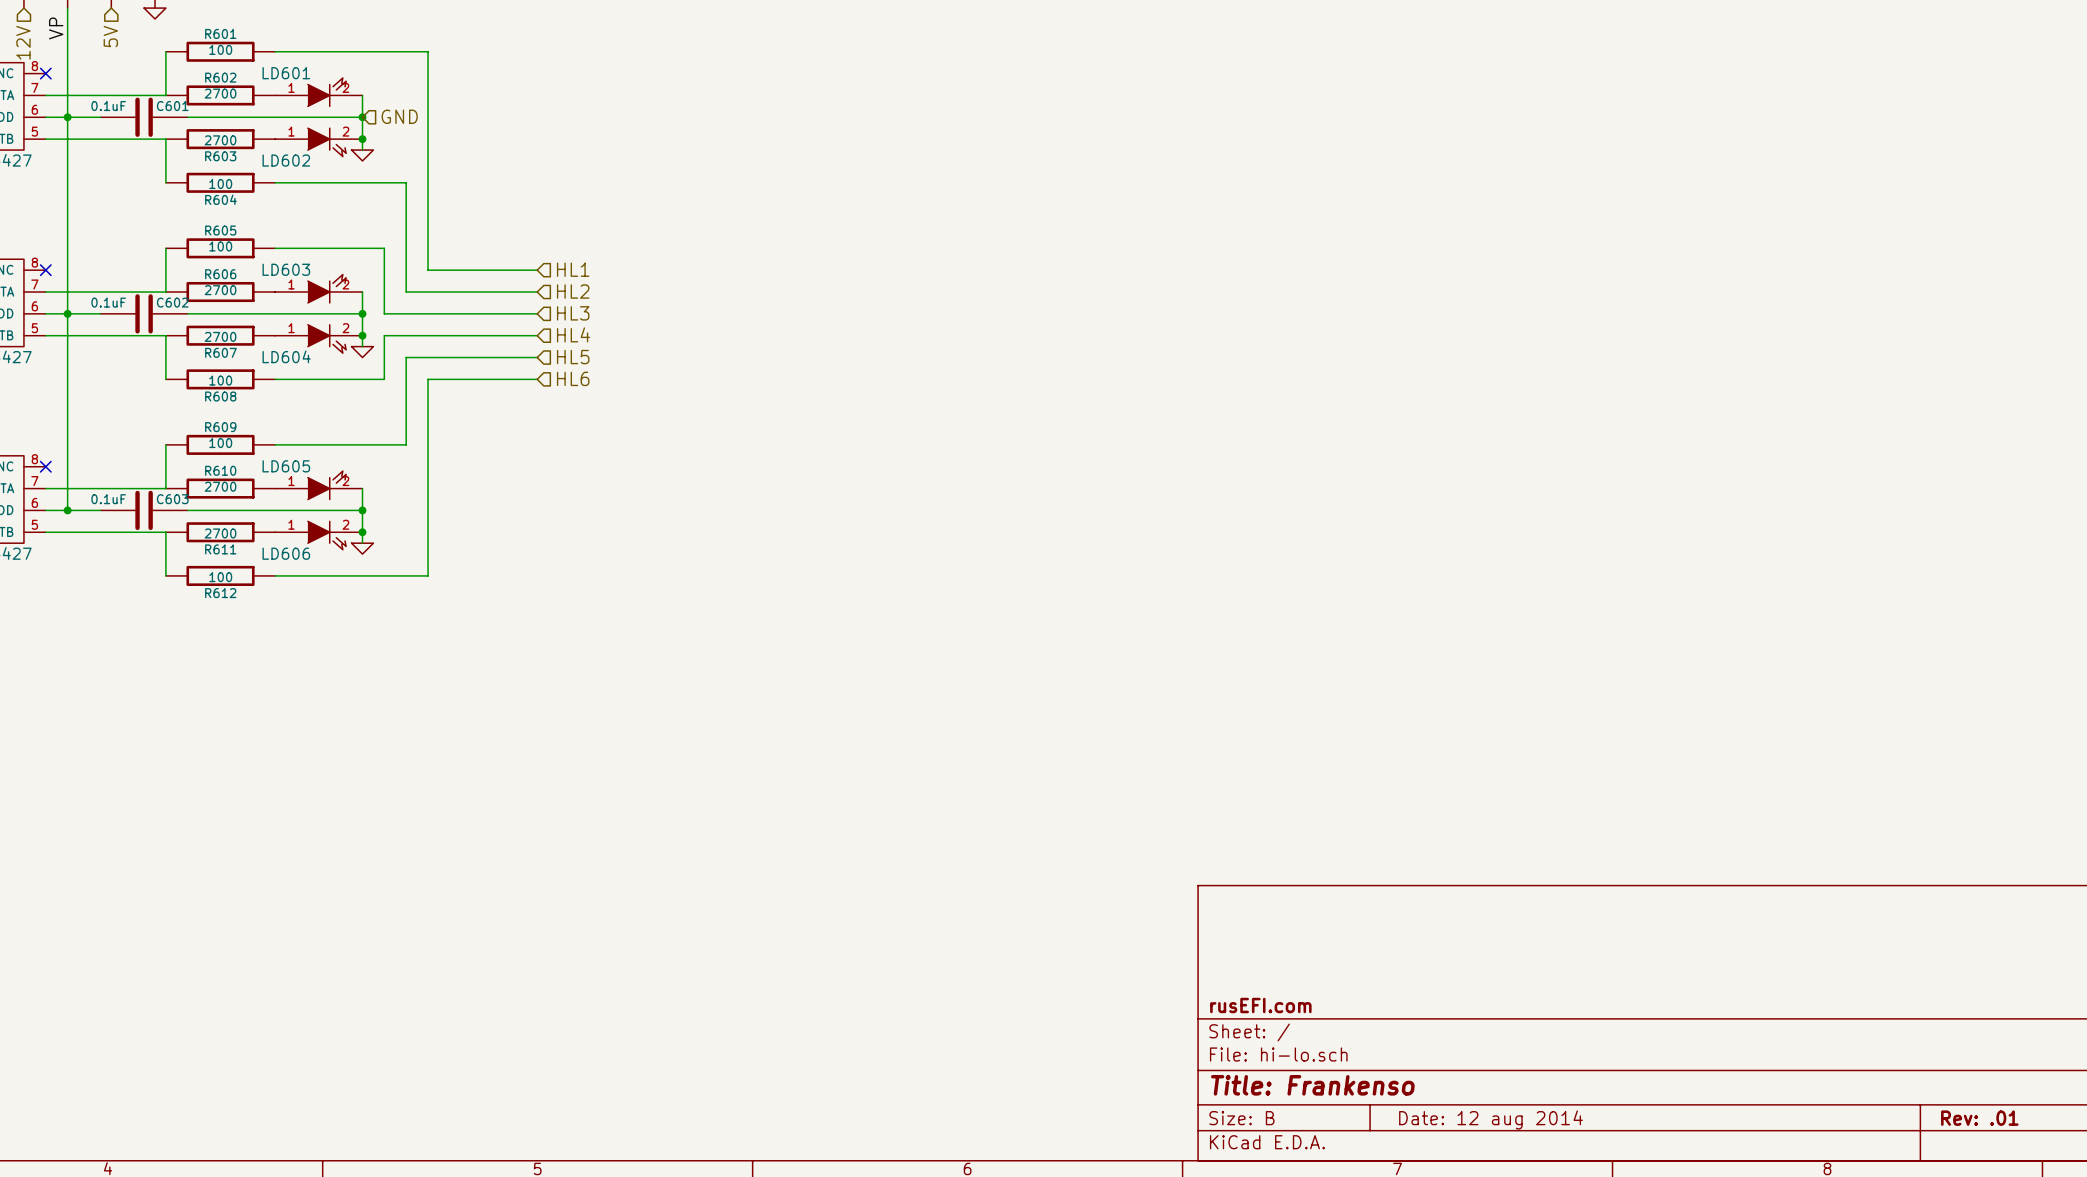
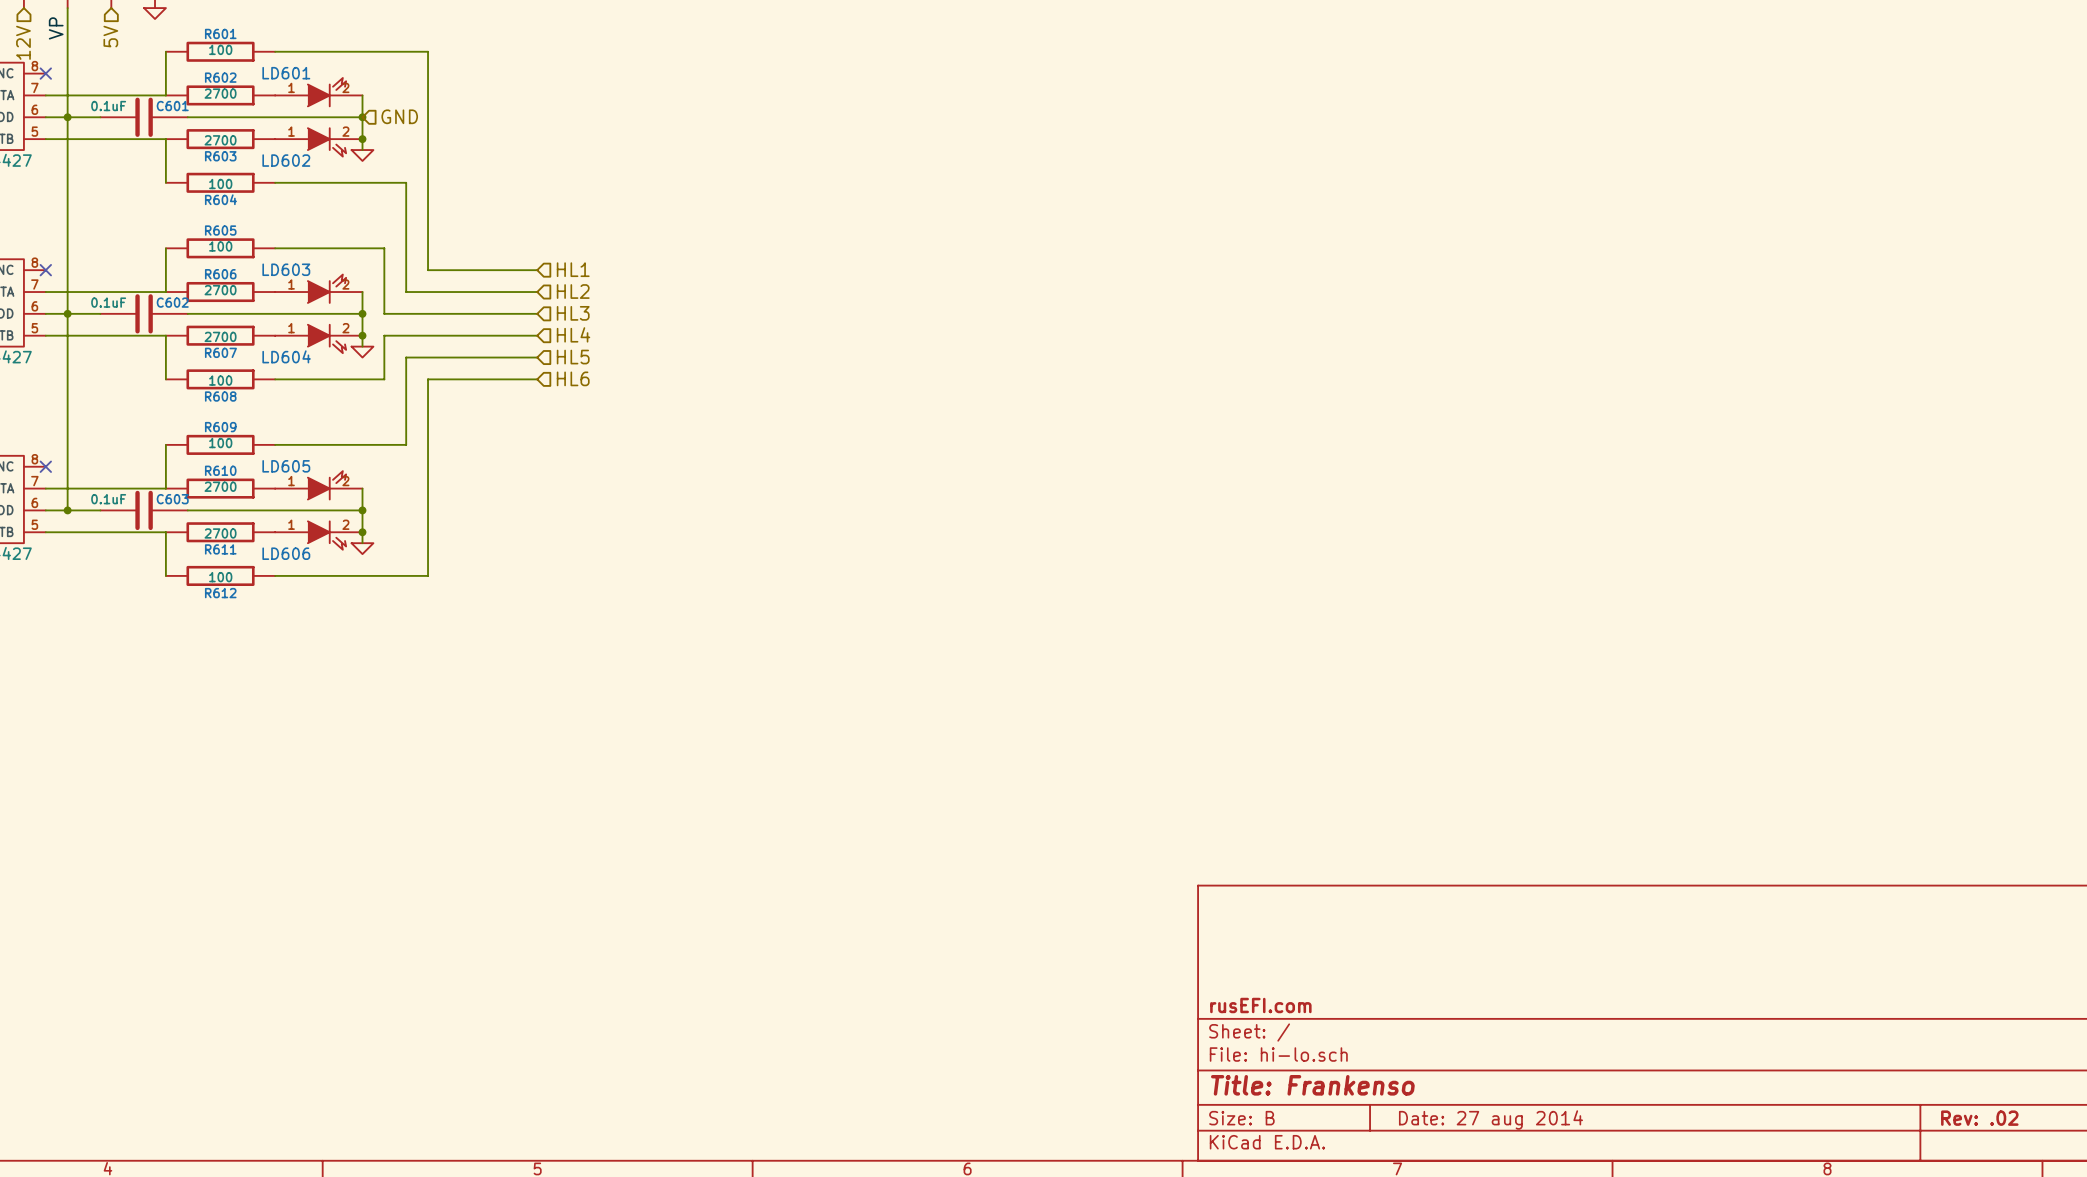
title block: Rev: .01 (1979, 1118) -> Rev: .02 (1979, 1118)
title block: Date: 12 aug 2014 (1490, 1119) -> Date: 27 aug 2014 (1490, 1119)

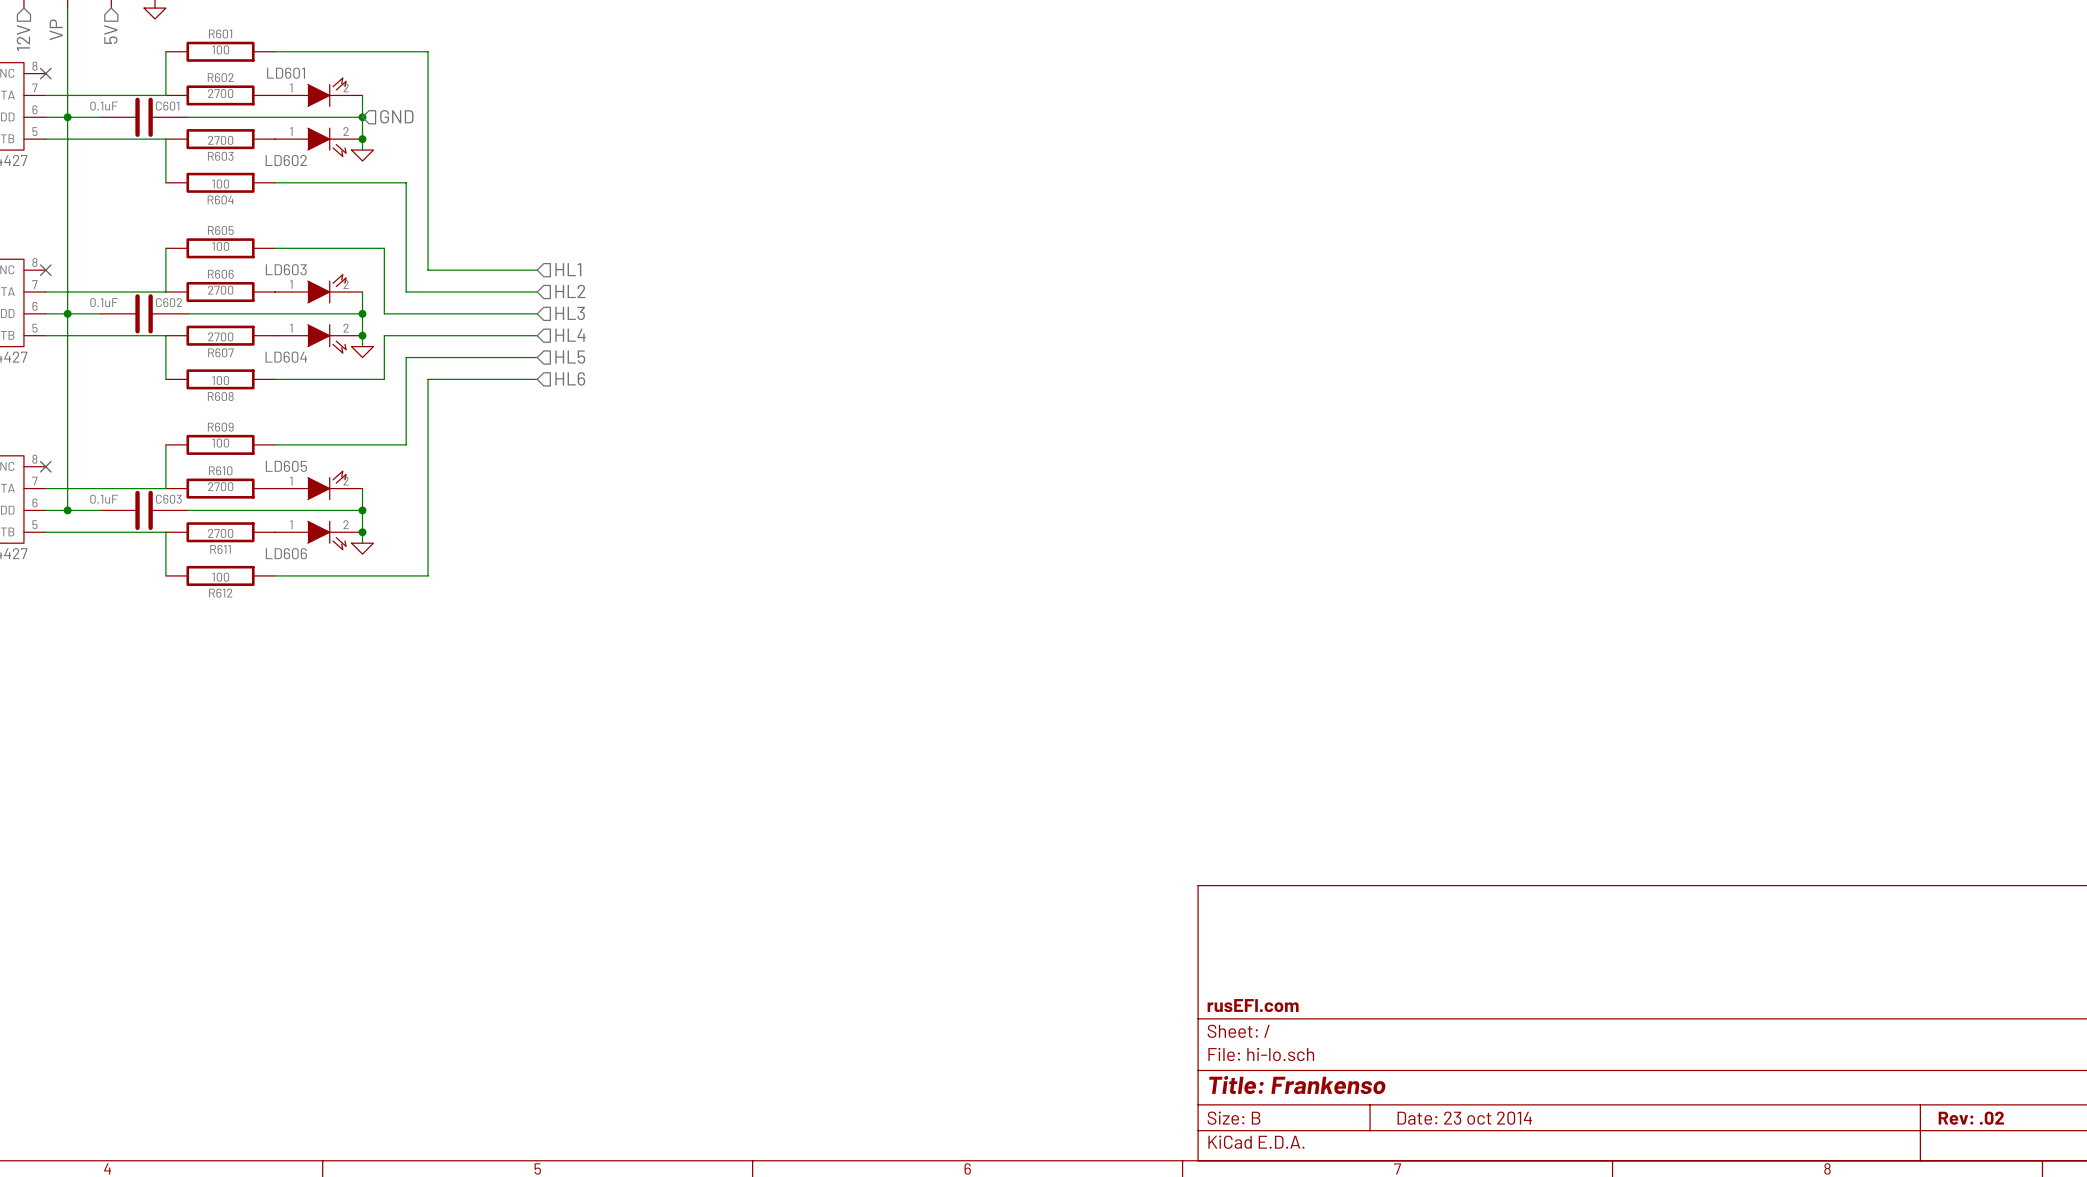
title block: Date: 27 aug 2014 (1490, 1119) -> Date: 23 oct 2014 (1464, 1118)

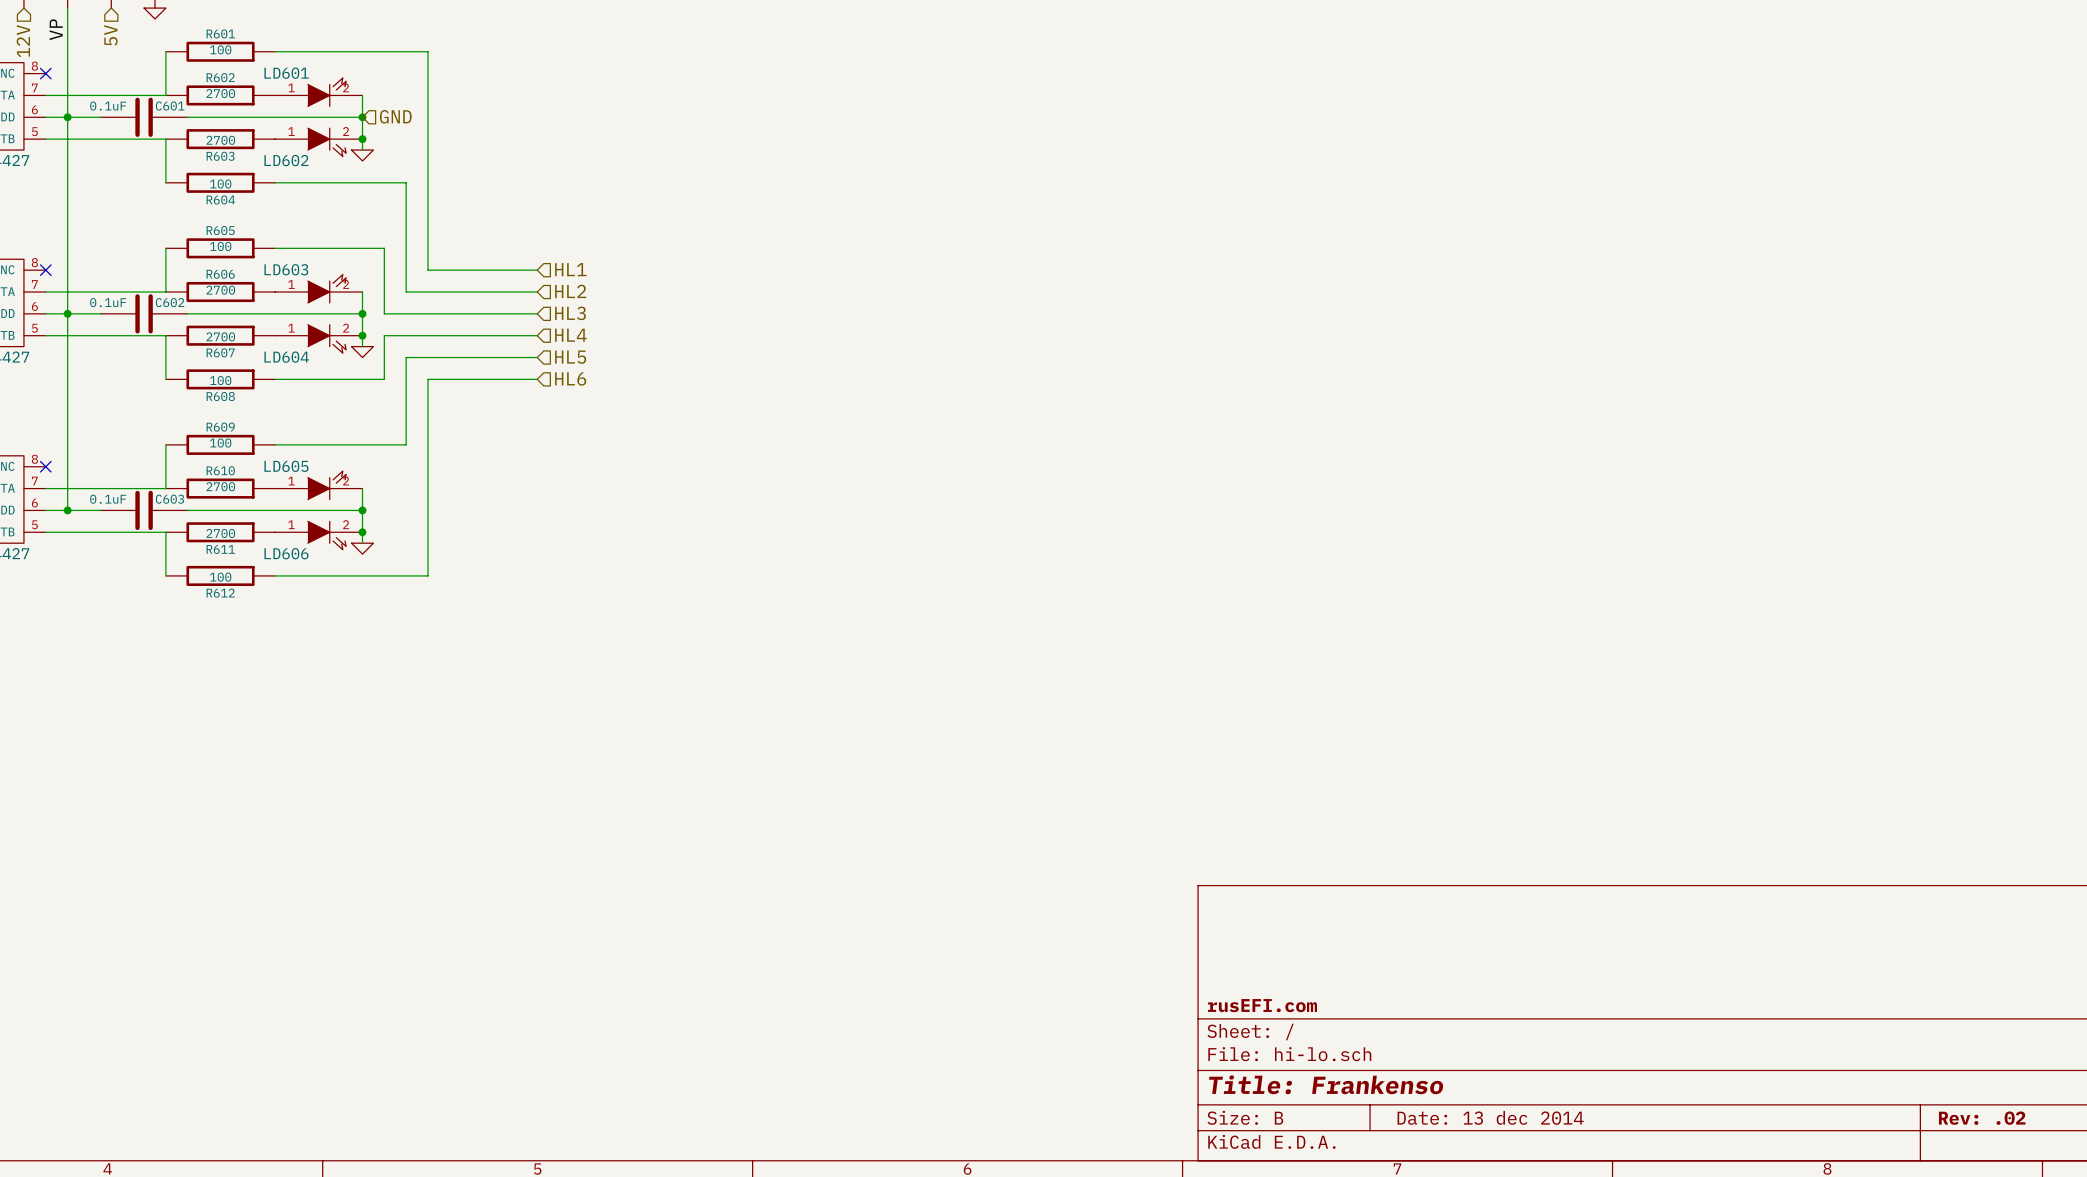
title block: Date: 23 oct 2014 (1464, 1118) -> Date: 13 dec 2014 (1490, 1117)

